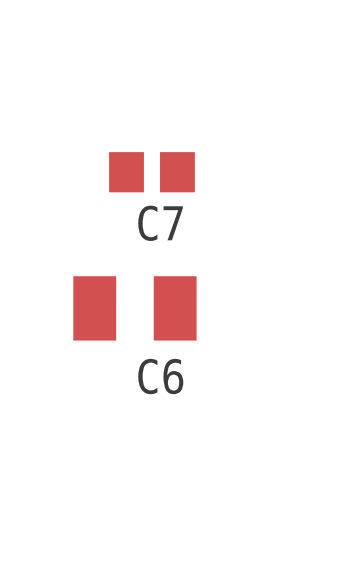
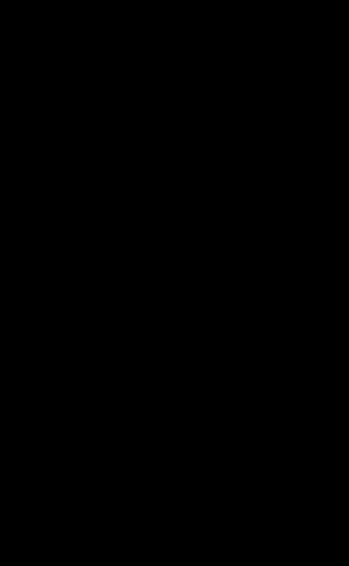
C7: (151, 172) -> none
C6: (134, 308) -> none

